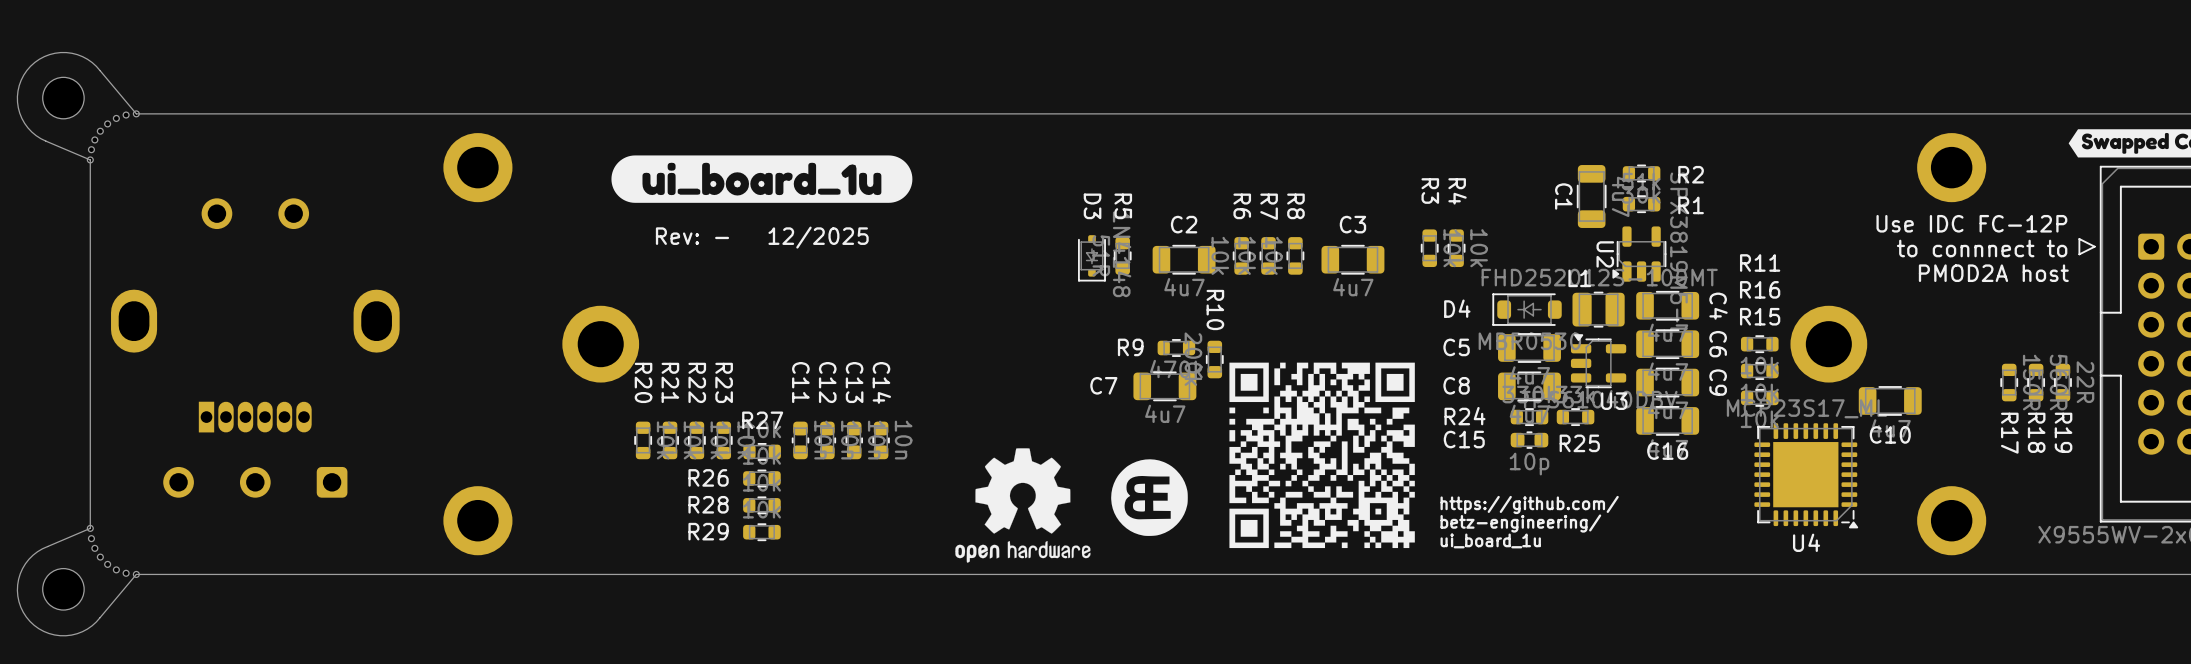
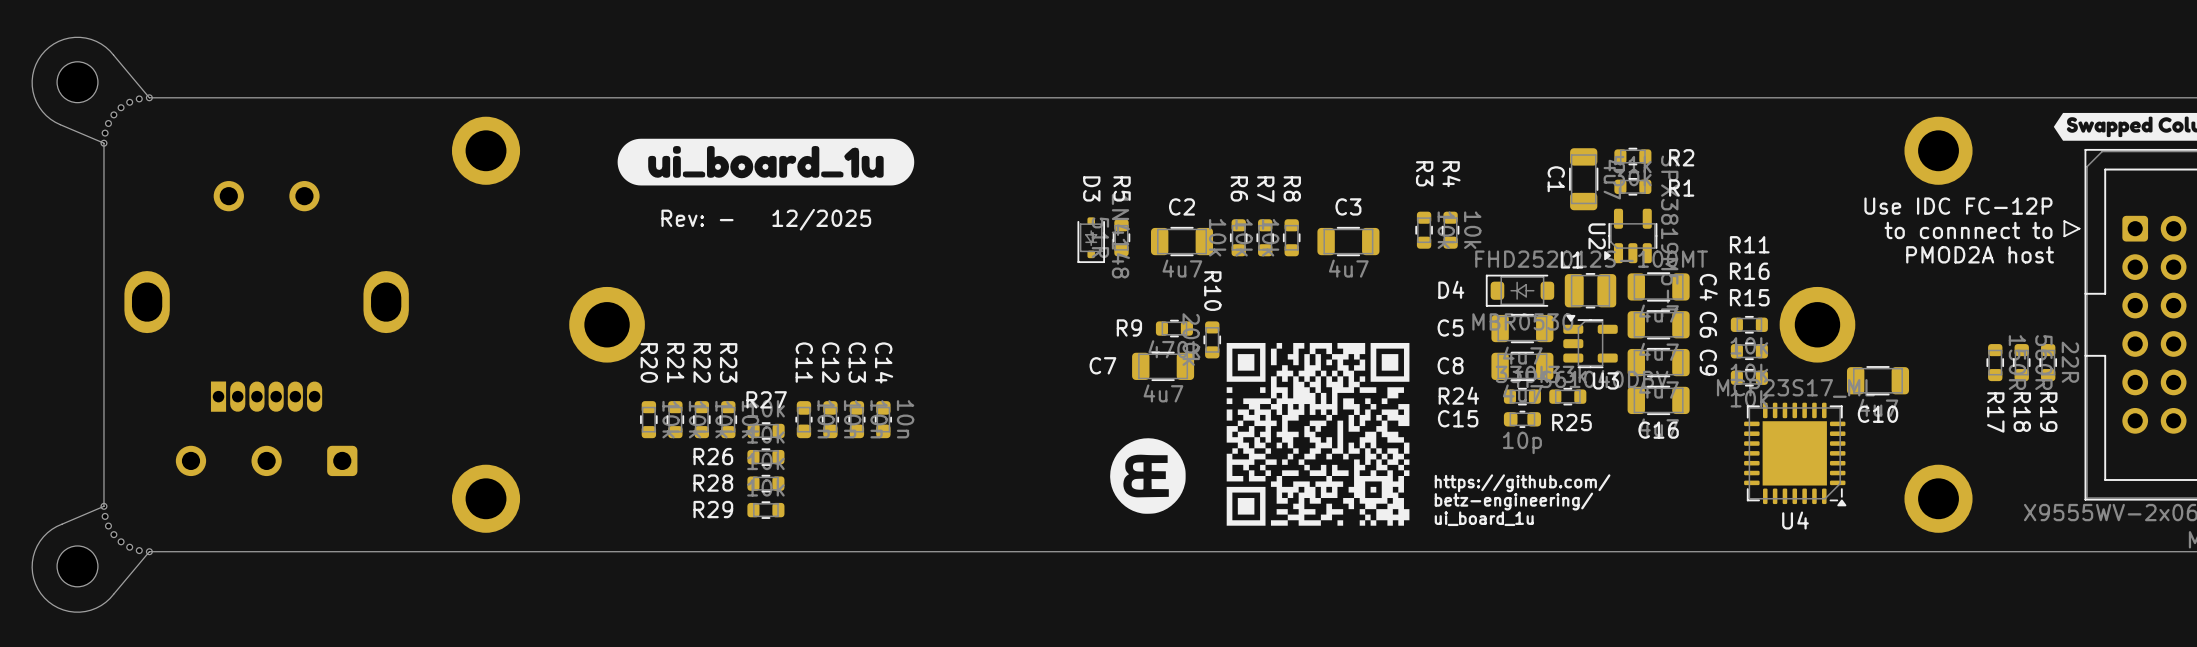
drawing: [955, 448, 1091, 563] -> none

